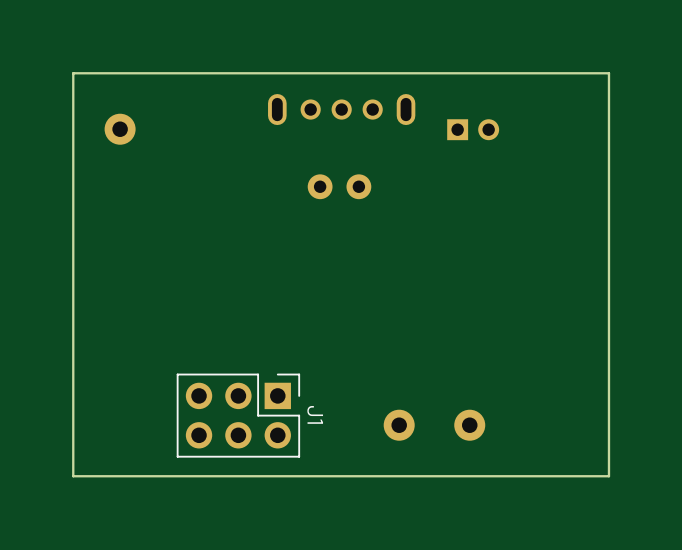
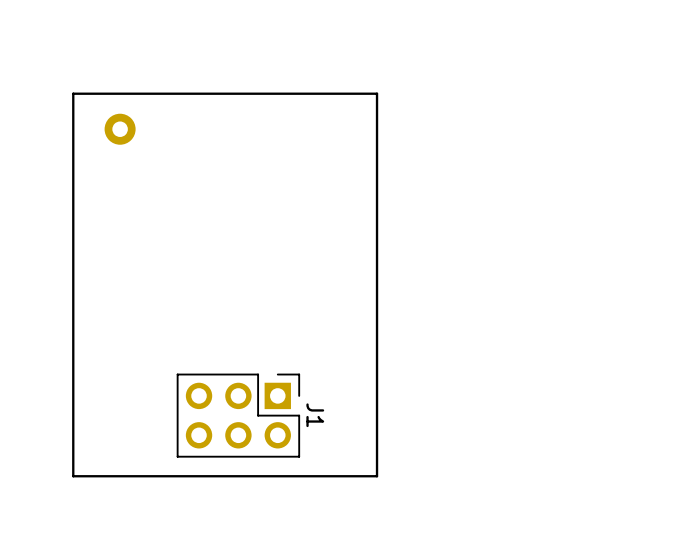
board edge: (73, 93) (73, 73) (608, 73) (608, 476) (377, 476) -> (73, 93) (377, 93) (377, 476)
part: (341, 109) -> none
part: (473, 129) -> none
part: (339, 186) -> none
part: (399, 425) -> none
part: (469, 425) -> none

